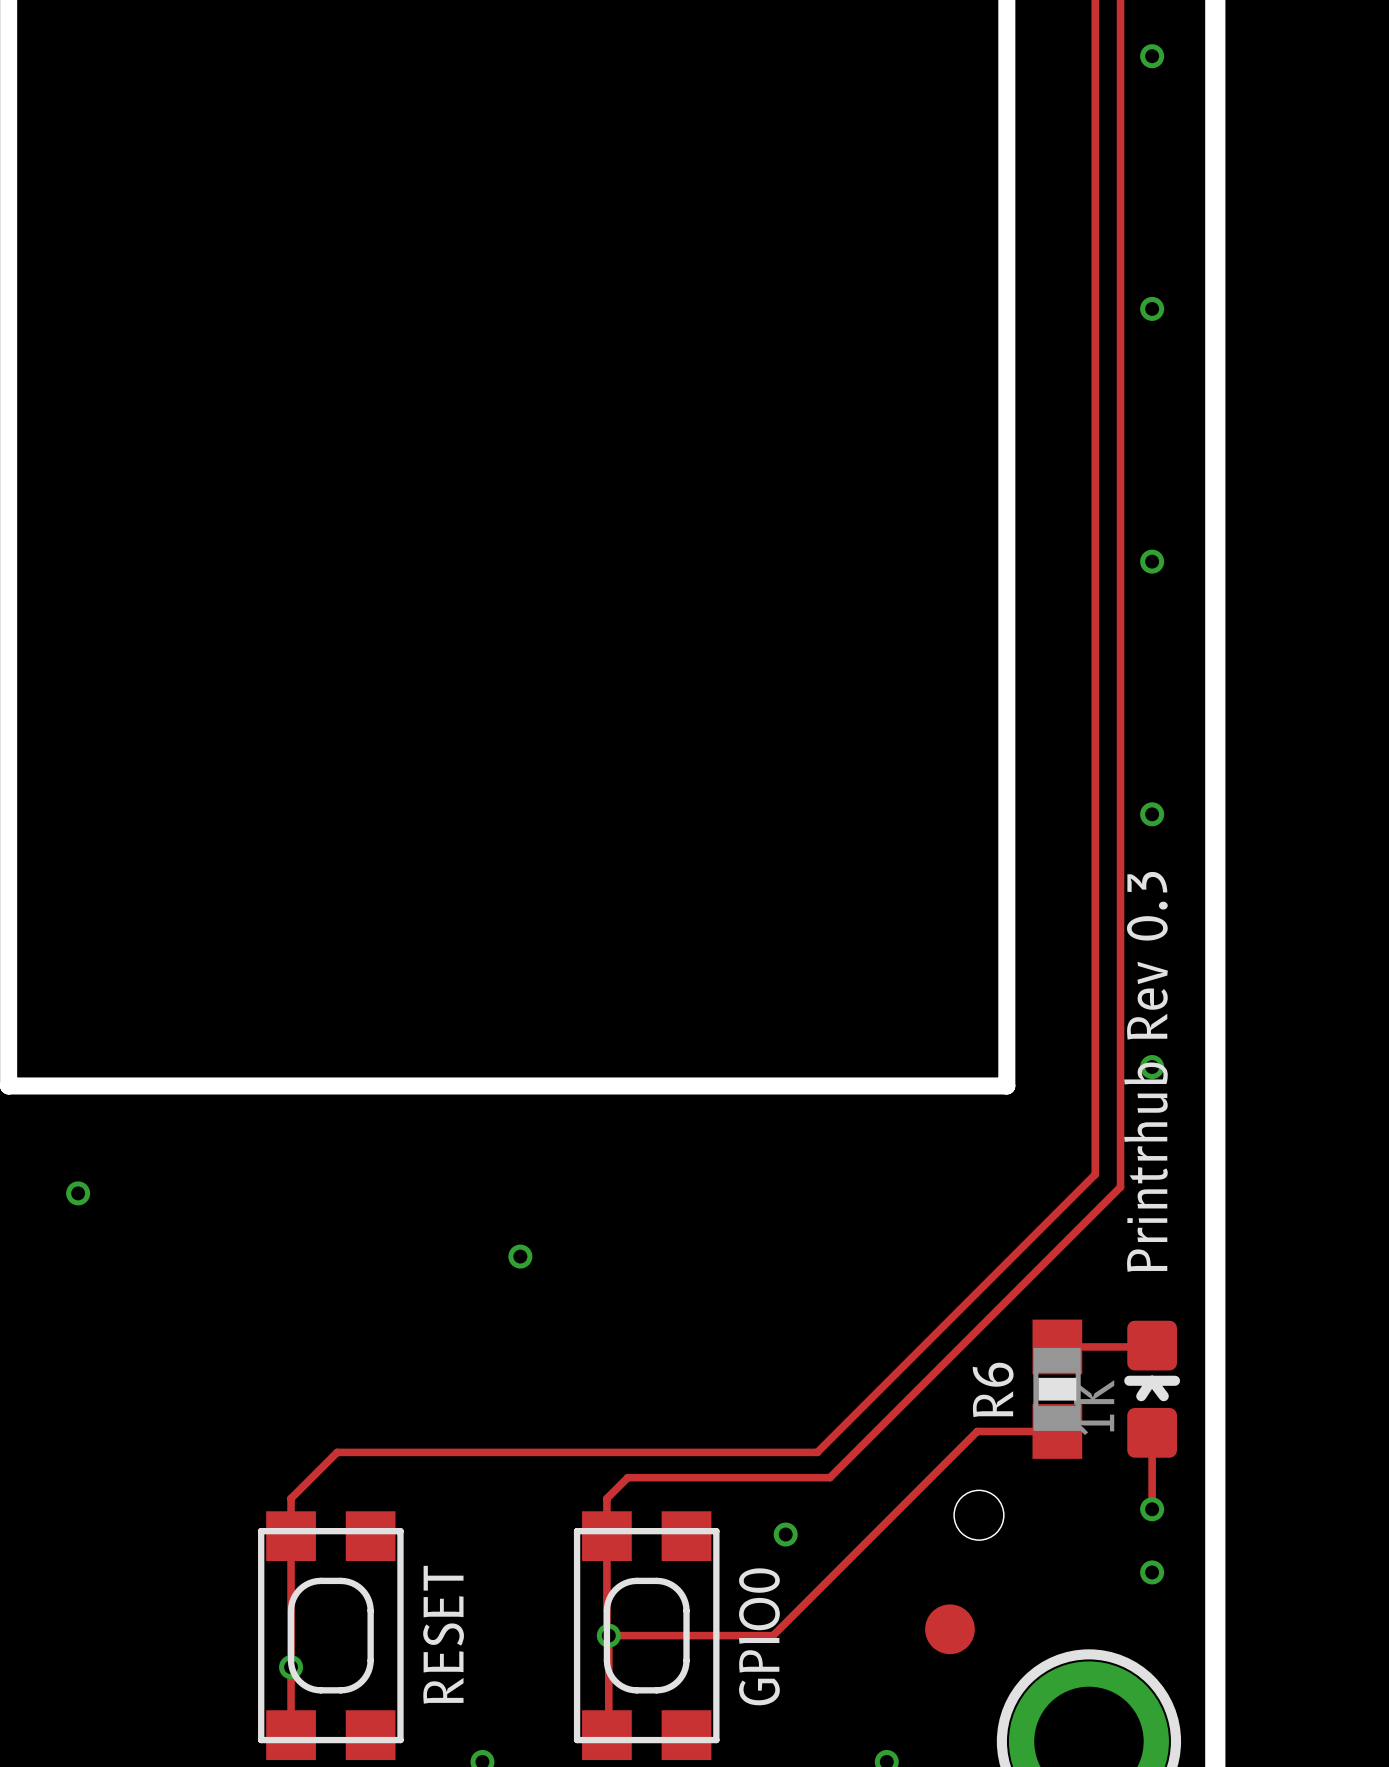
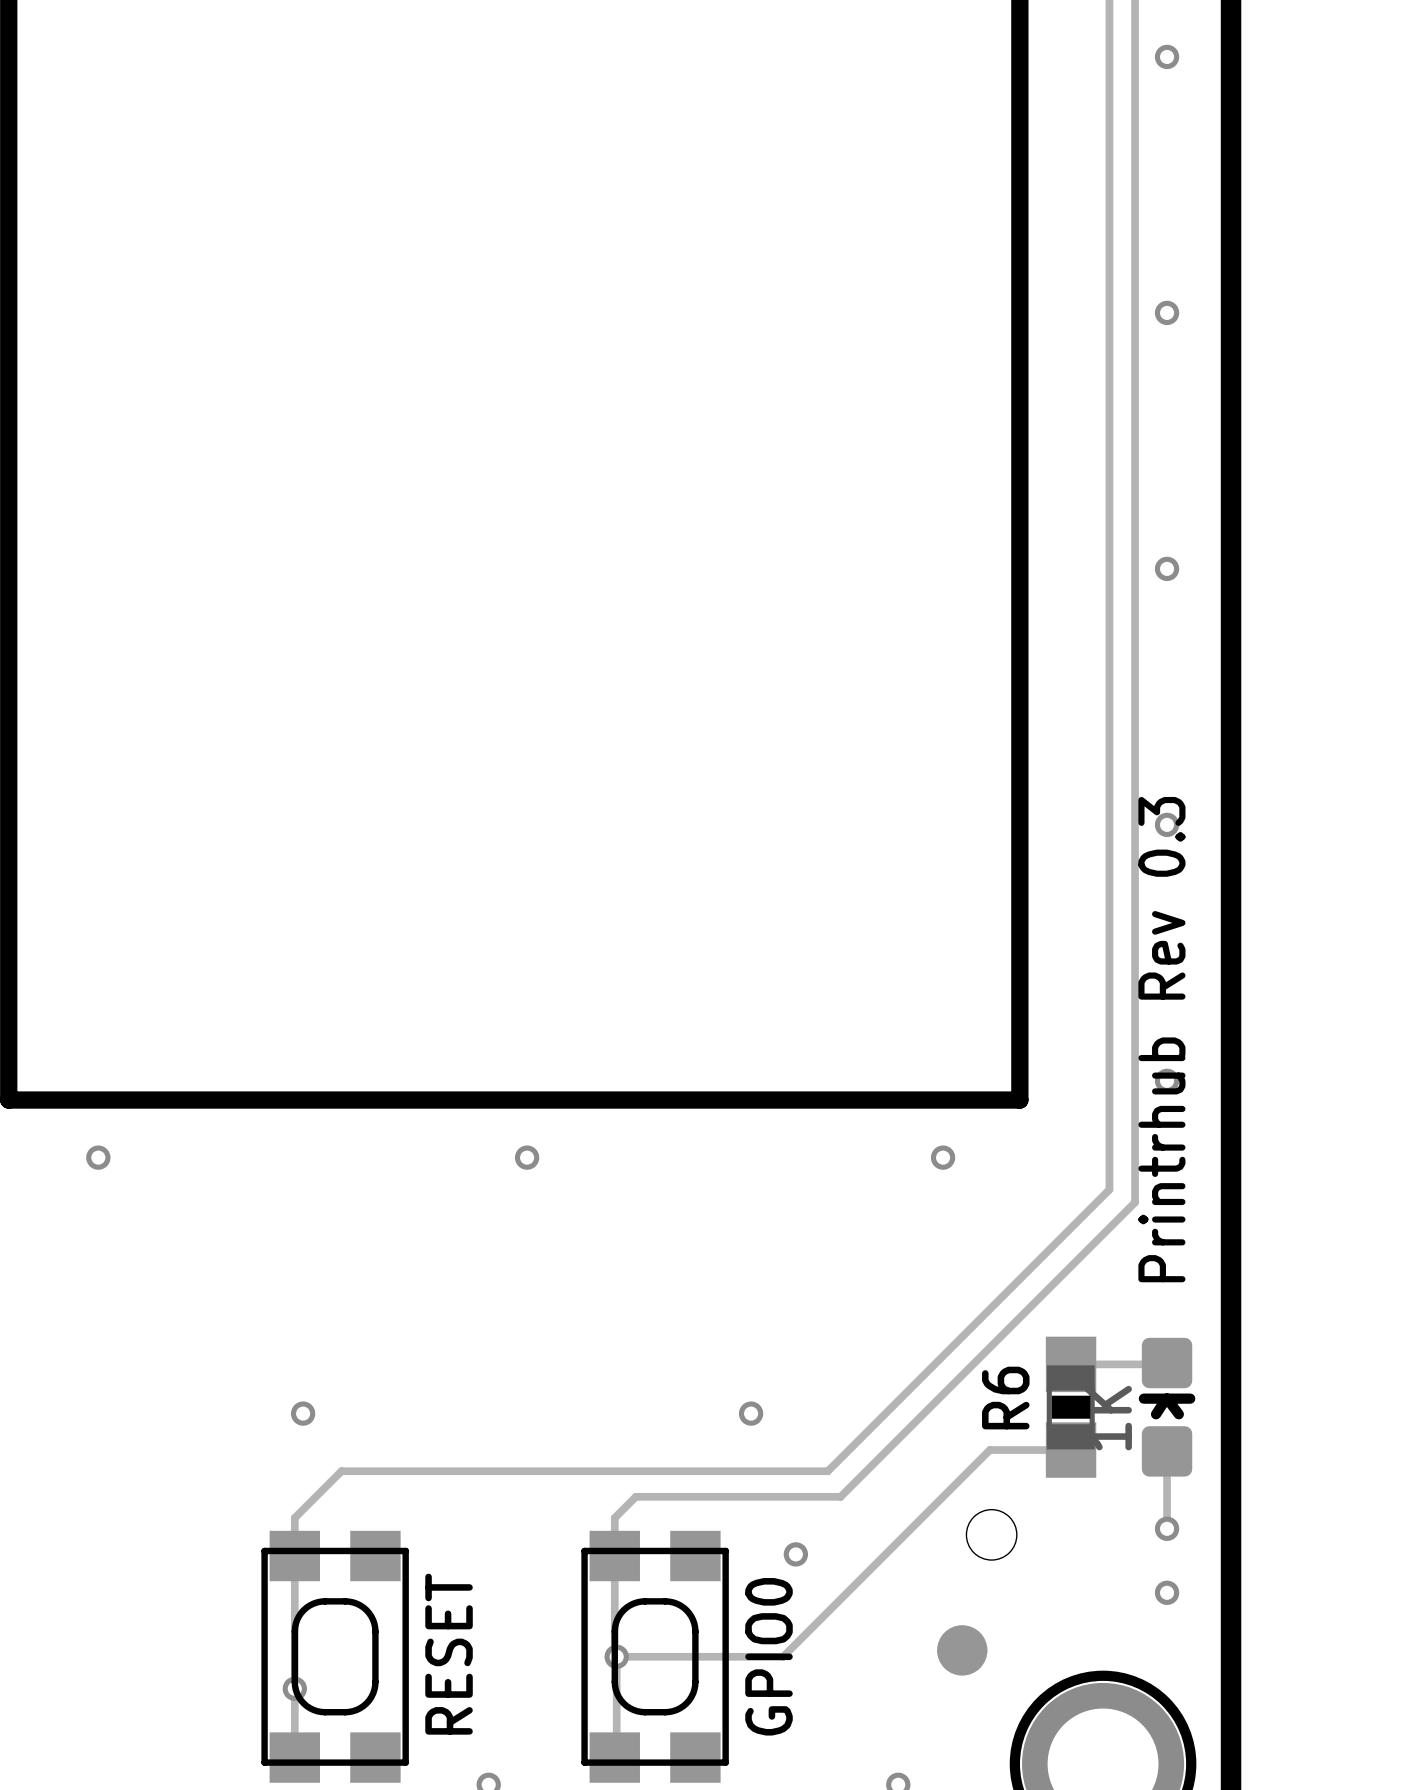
via: none -> (943, 1157)
via position: (78, 1193) -> (98, 1157)
via position: (520, 1256) -> (527, 1157)
via: none -> (303, 1413)
via: none -> (751, 1413)

